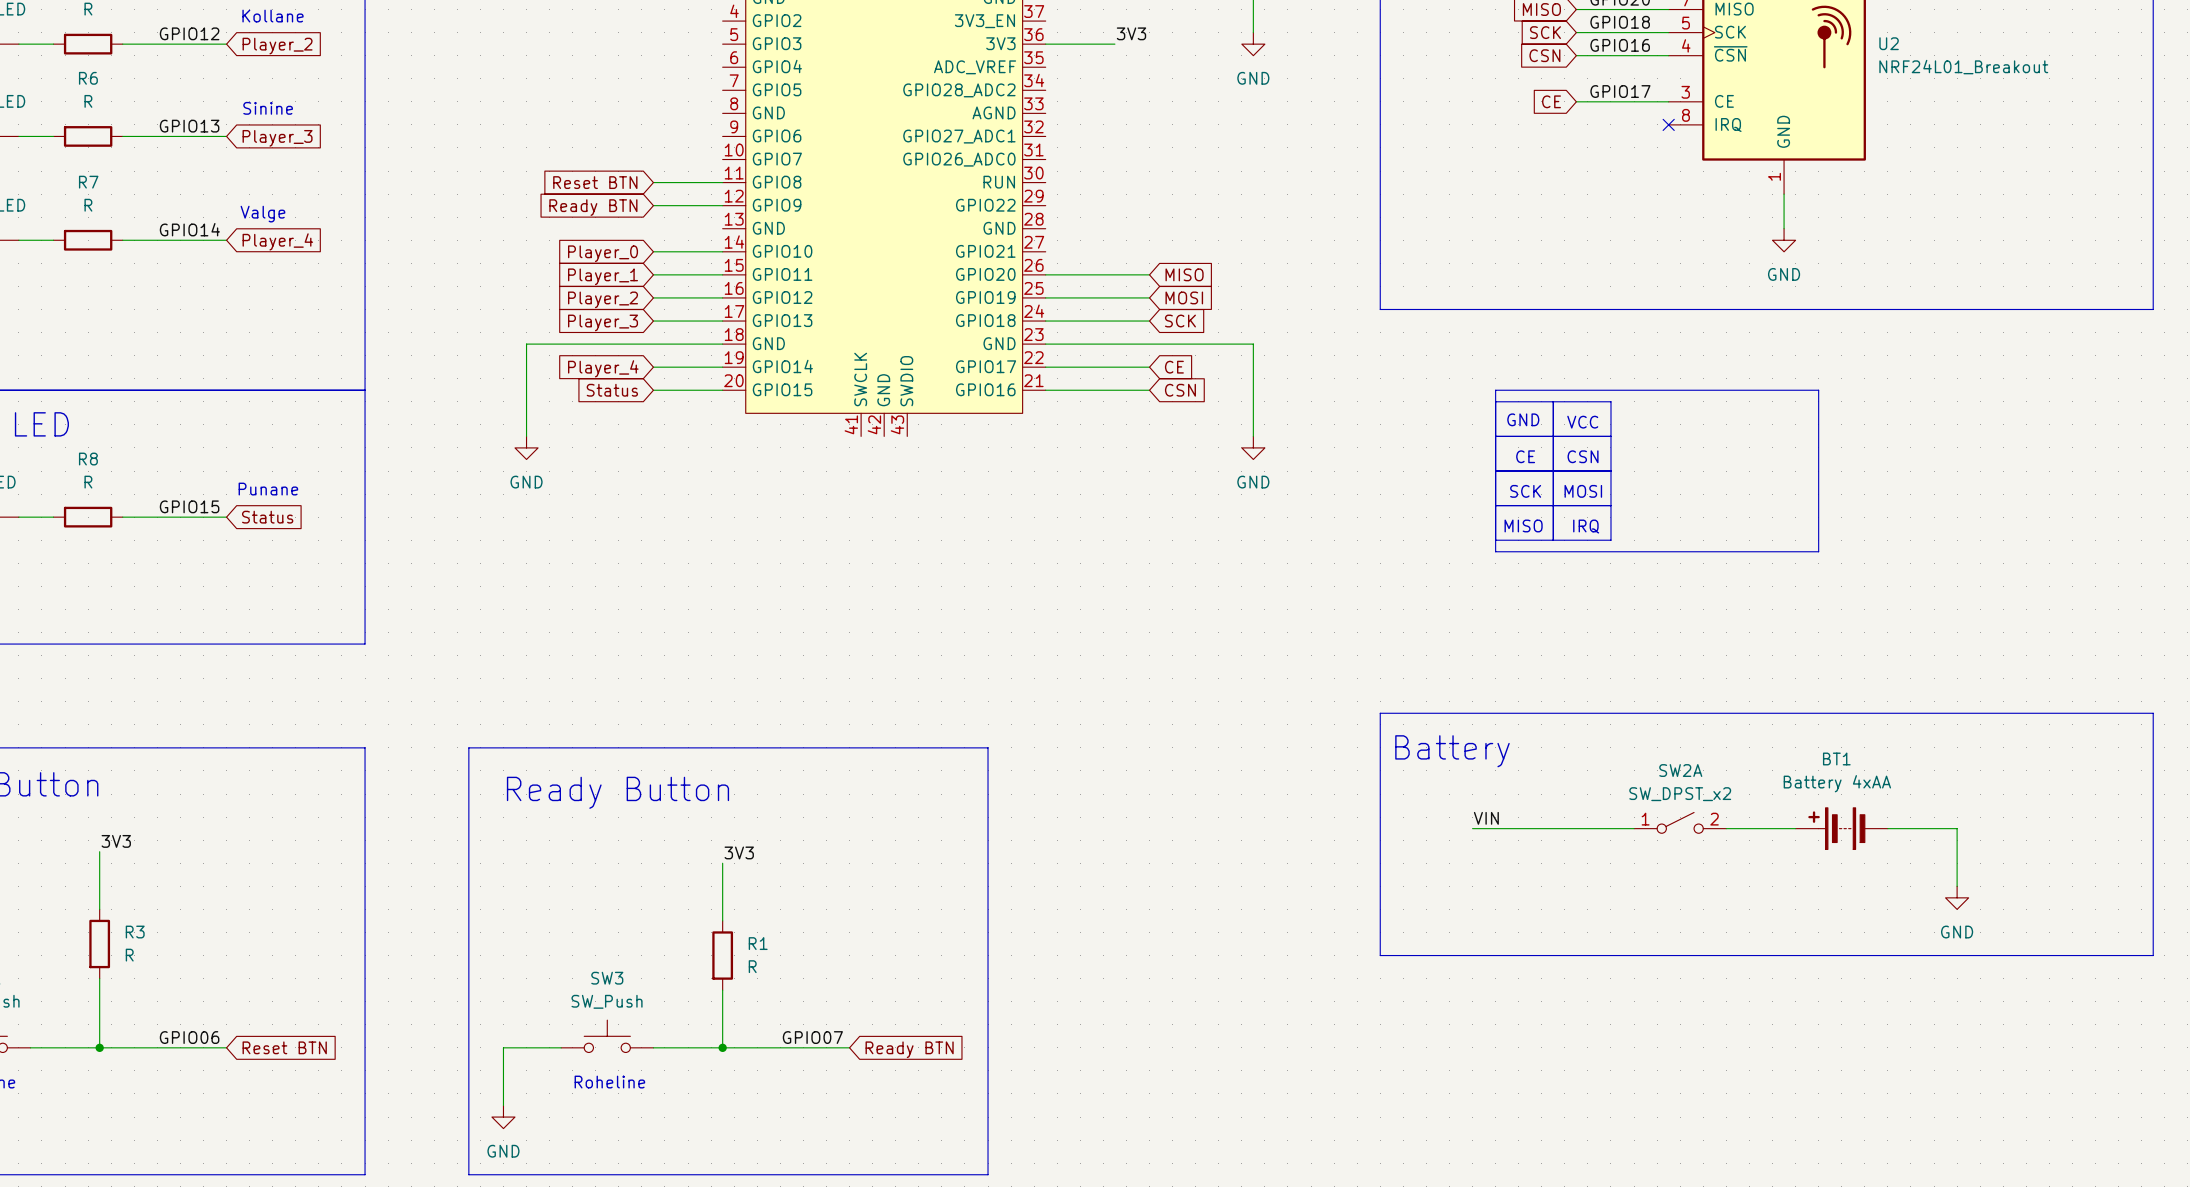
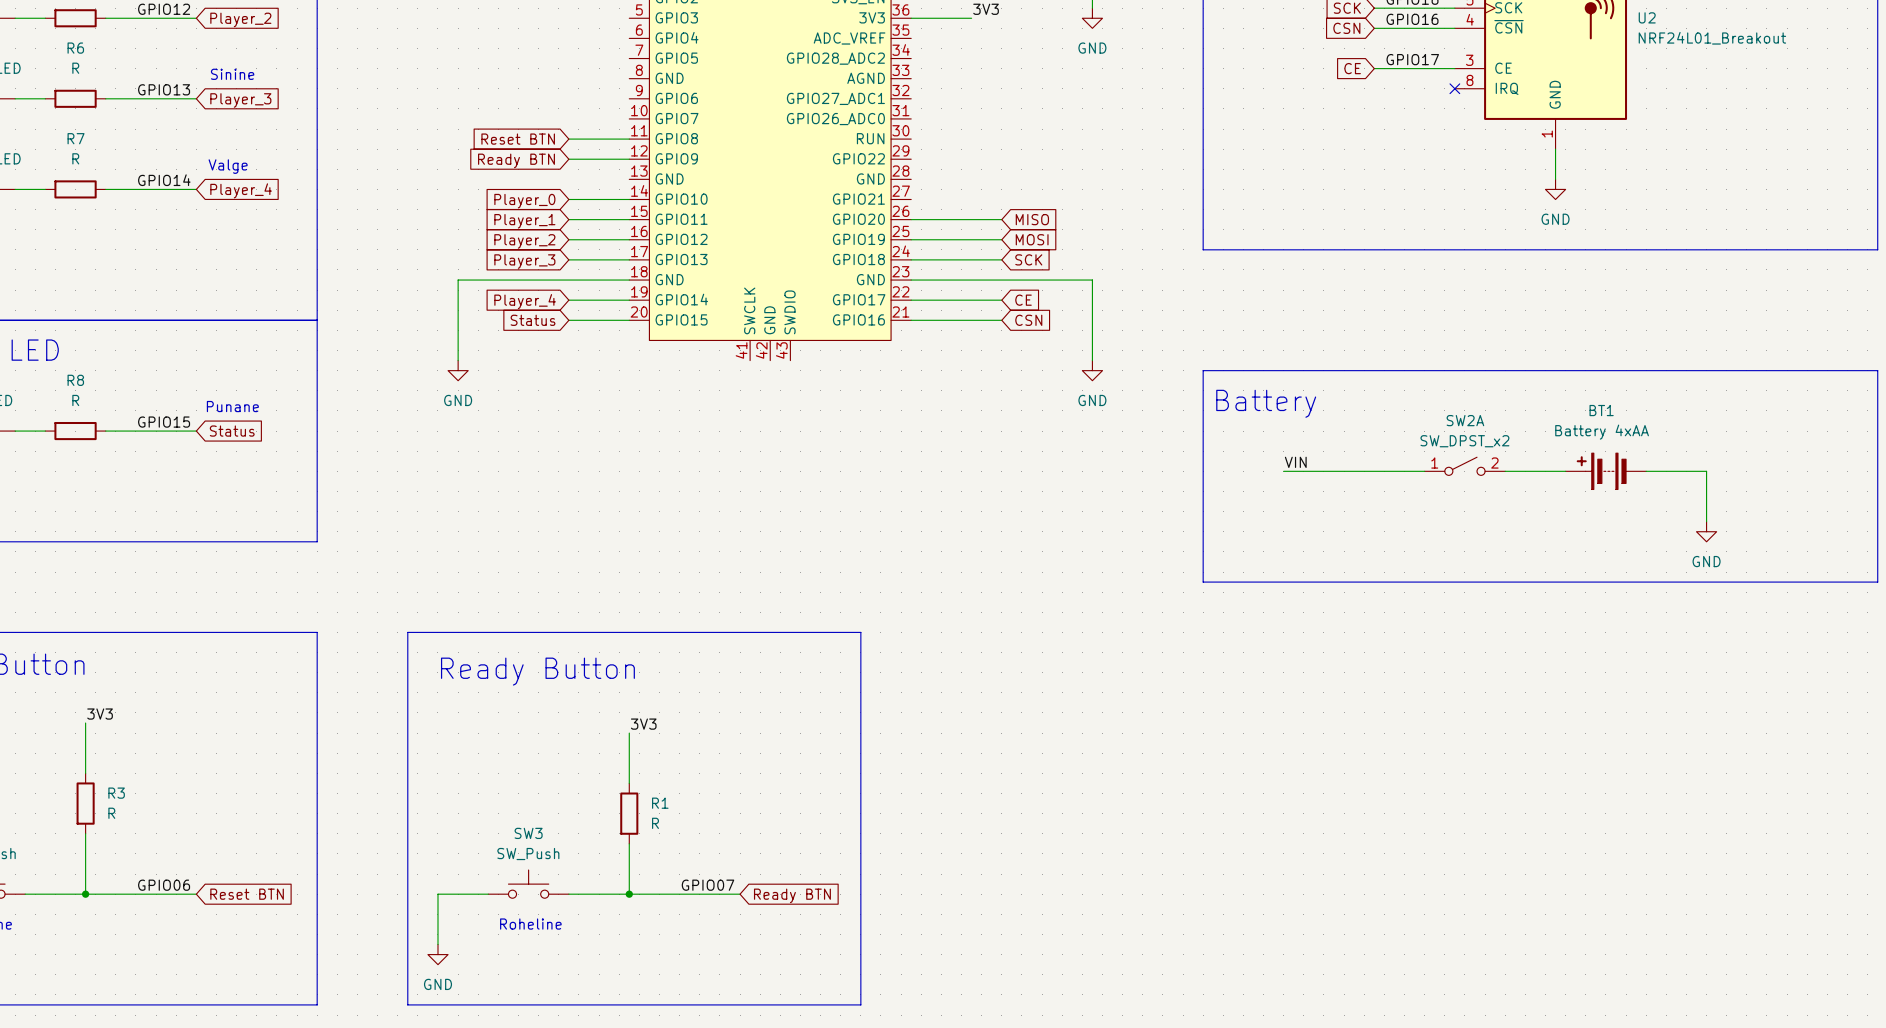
line: (1495, 390) (1495, 551) (1818, 551) (1818, 390) (1495, 390) -> none
line: (1495, 401) (1610, 401) (1610, 540) (1495, 540) -> none
line: (1553, 401) (1553, 540) -> none
text: GND (1523, 419) -> none
text: VCC (1582, 422) -> none
line: (1495, 436) (1610, 436) -> none
line: none -> (1203, 370) (1877, 370) (1877, 582) (1203, 582) (1203, 370)
text: CE (1525, 456) -> none
text: CSN (1583, 456) -> none
line: (1495, 471) (1610, 471) -> none
text: none -> Battery (1266, 403)
text: SCK (1525, 491) -> none
text: MOSI (1583, 491) -> none
line: (1495, 505) (1610, 505) -> none
text: MISO (1523, 525) -> none
text: IRQ (1586, 526) -> none
label: none -> VIN (1295, 462)
wire: none -> (1283, 471) (1424, 471)
wire: none -> (1505, 471) (1565, 471)
wire: none -> (1646, 471) (1706, 471) (1706, 521)
power symbol: none -> GND (1706, 531)
line: (1380, 713) (2153, 713) (2153, 955) (1380, 955) (1380, 713) -> none
text: Battery (1452, 751) -> none
label: VIN (1486, 818) -> none
SW2A position: (1680, 822) -> (1464, 466)
wire: (1472, 828) (1634, 828) -> none
wire: (1726, 828) (1795, 828) -> none
BT1 position: (1841, 828) -> (1605, 471)
wire: (1887, 828) (1957, 828) (1957, 886) -> none
power symbol: GND (1957, 897) -> none

